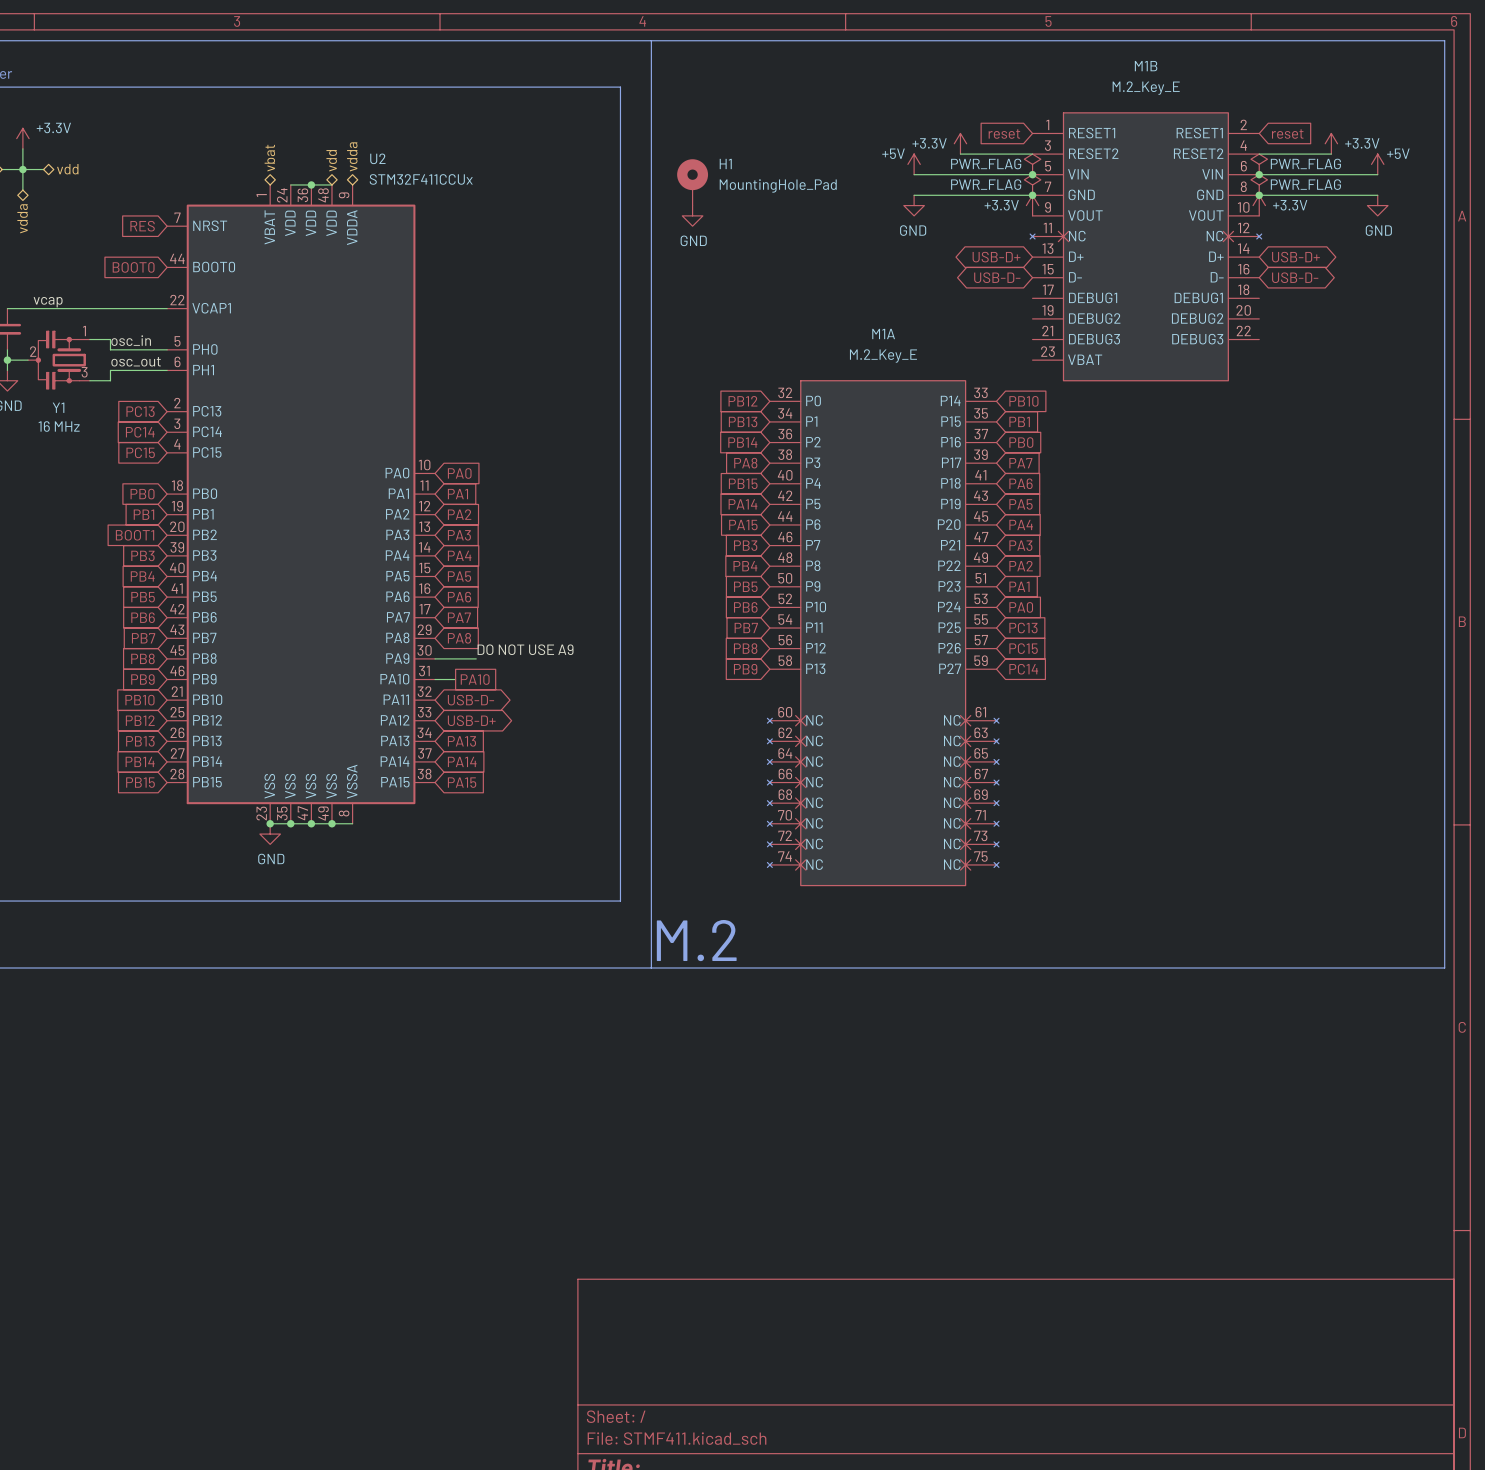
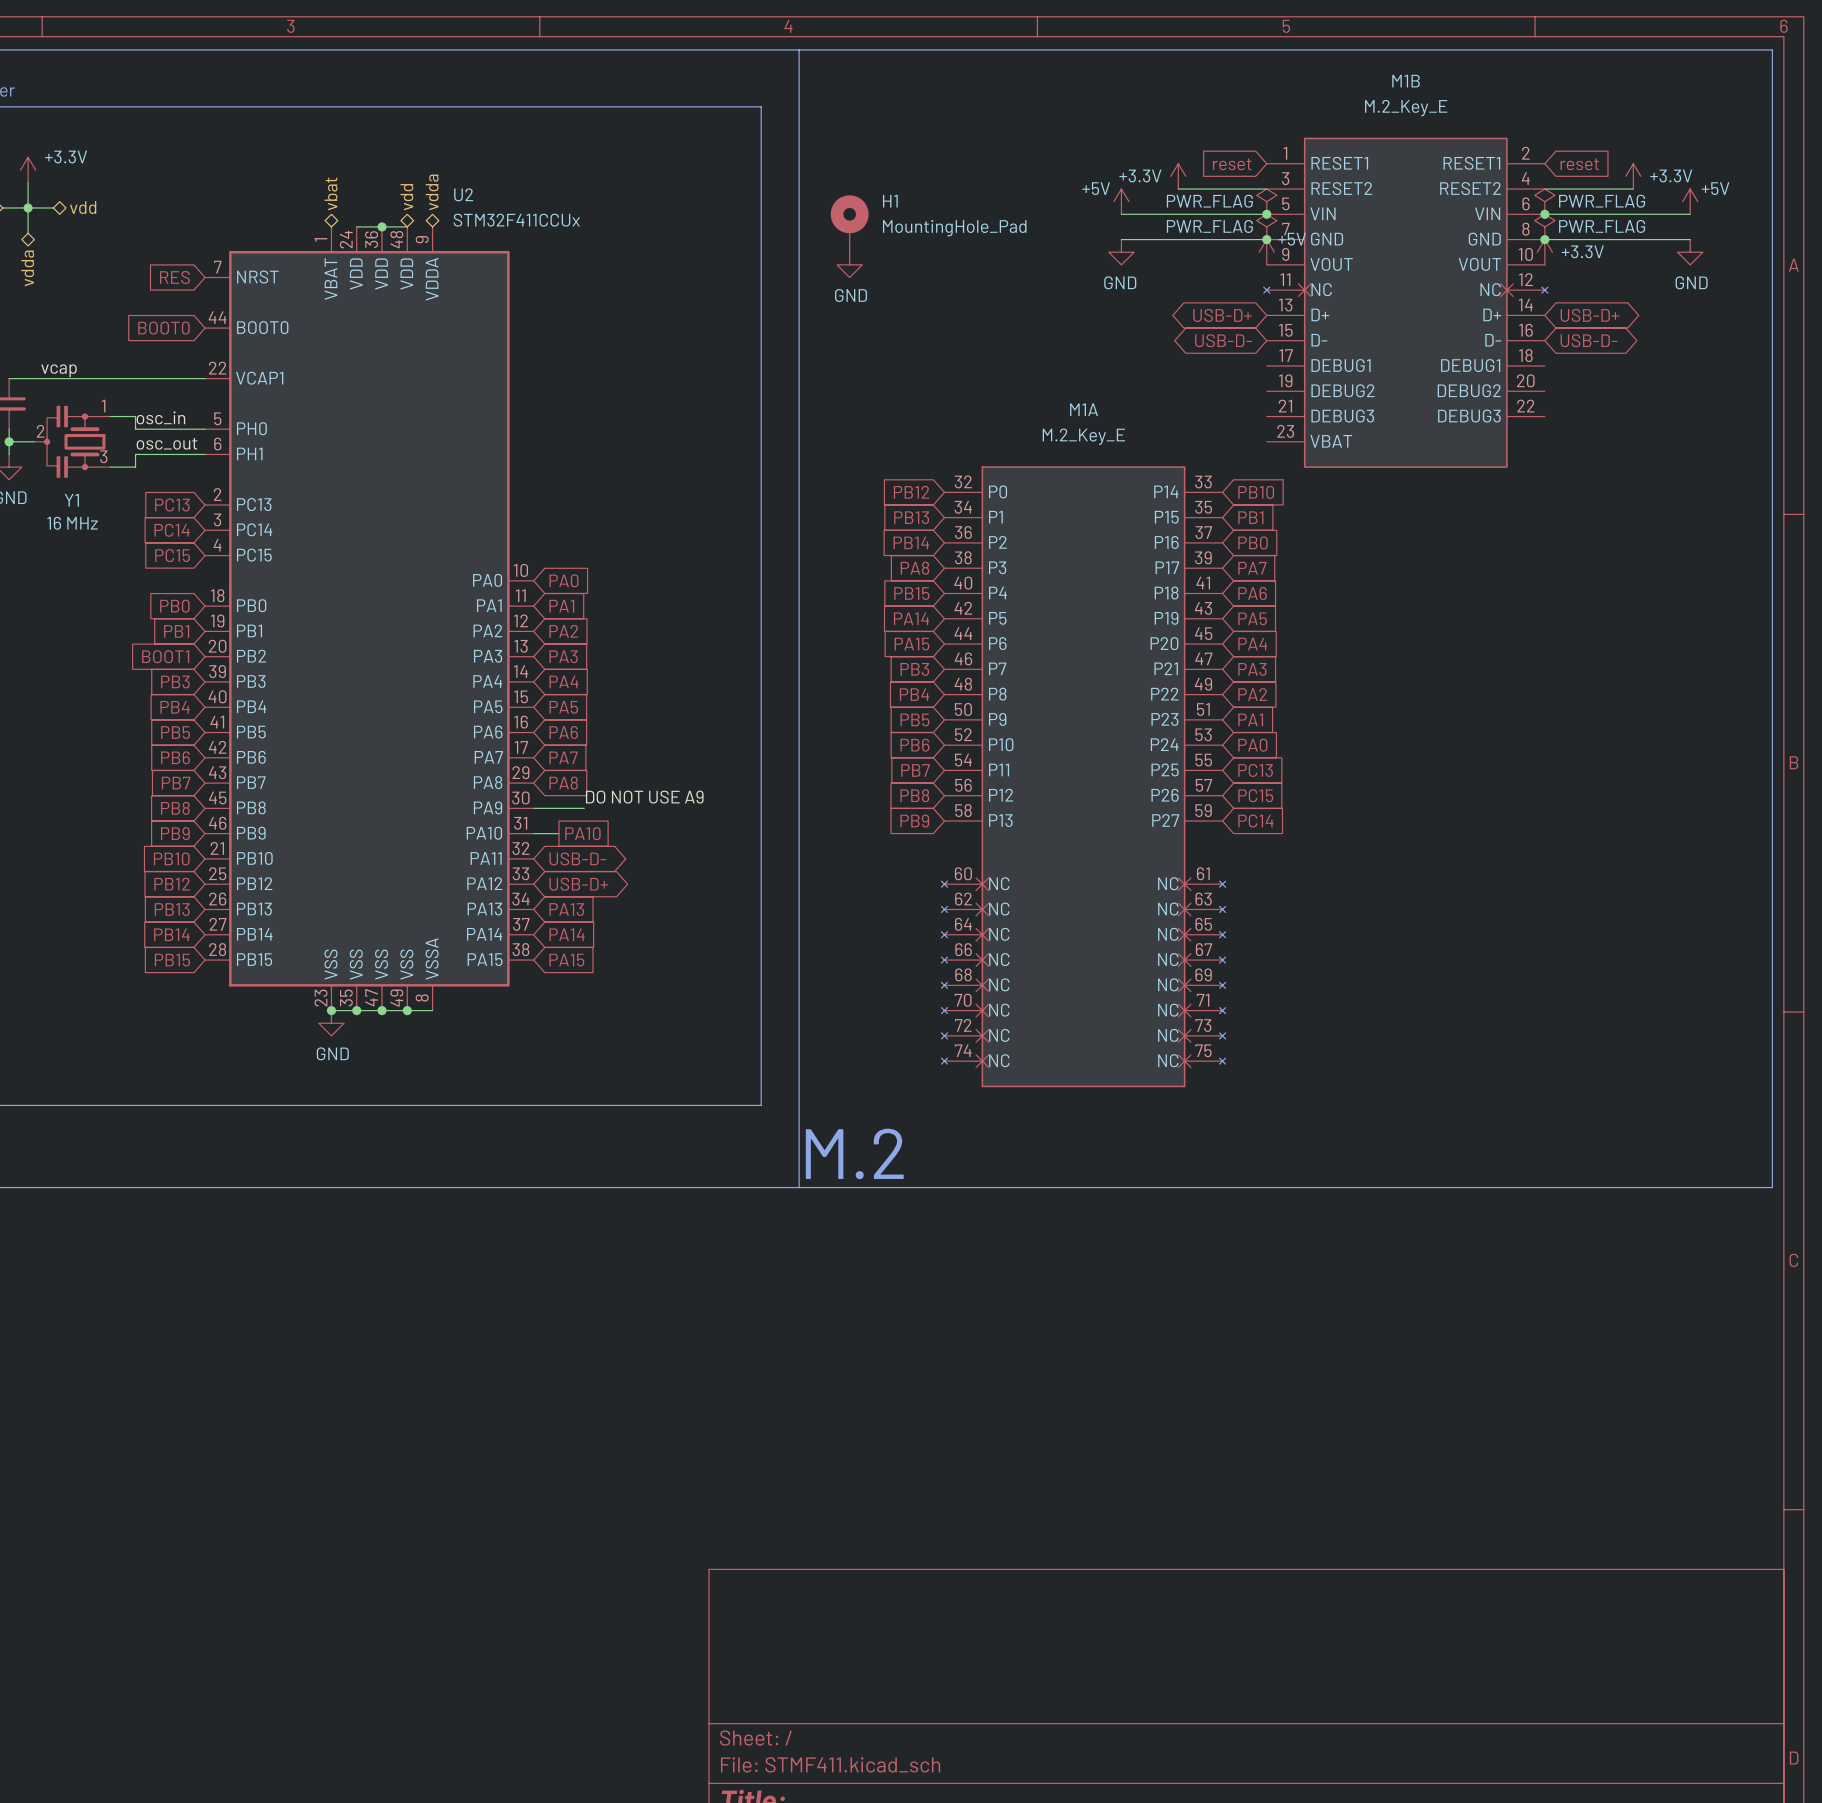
power symbol: +3.3V (1032, 205) -> +5V (1266, 252)

